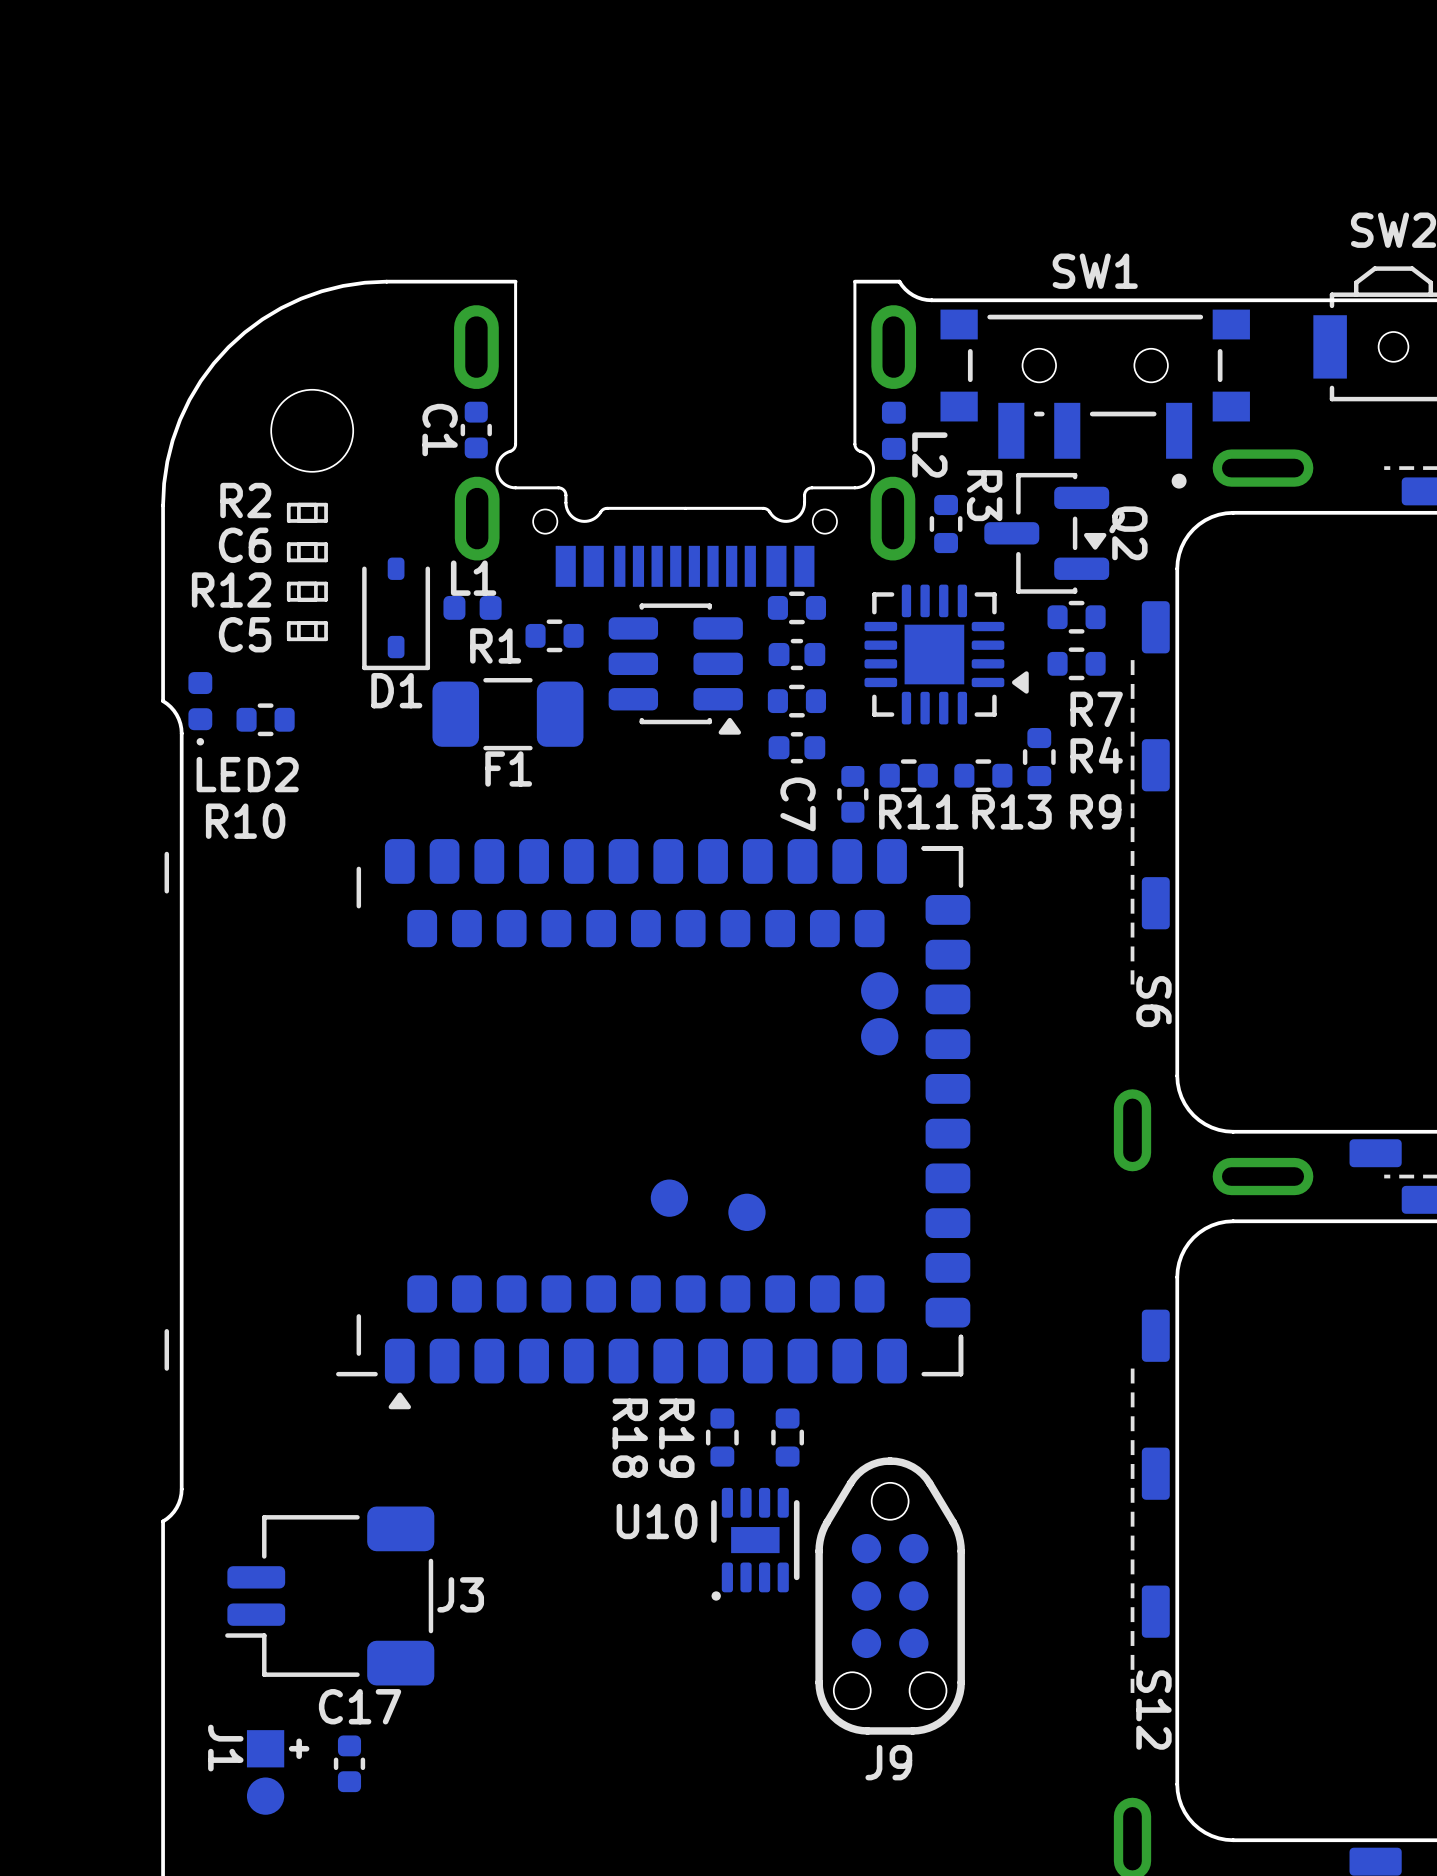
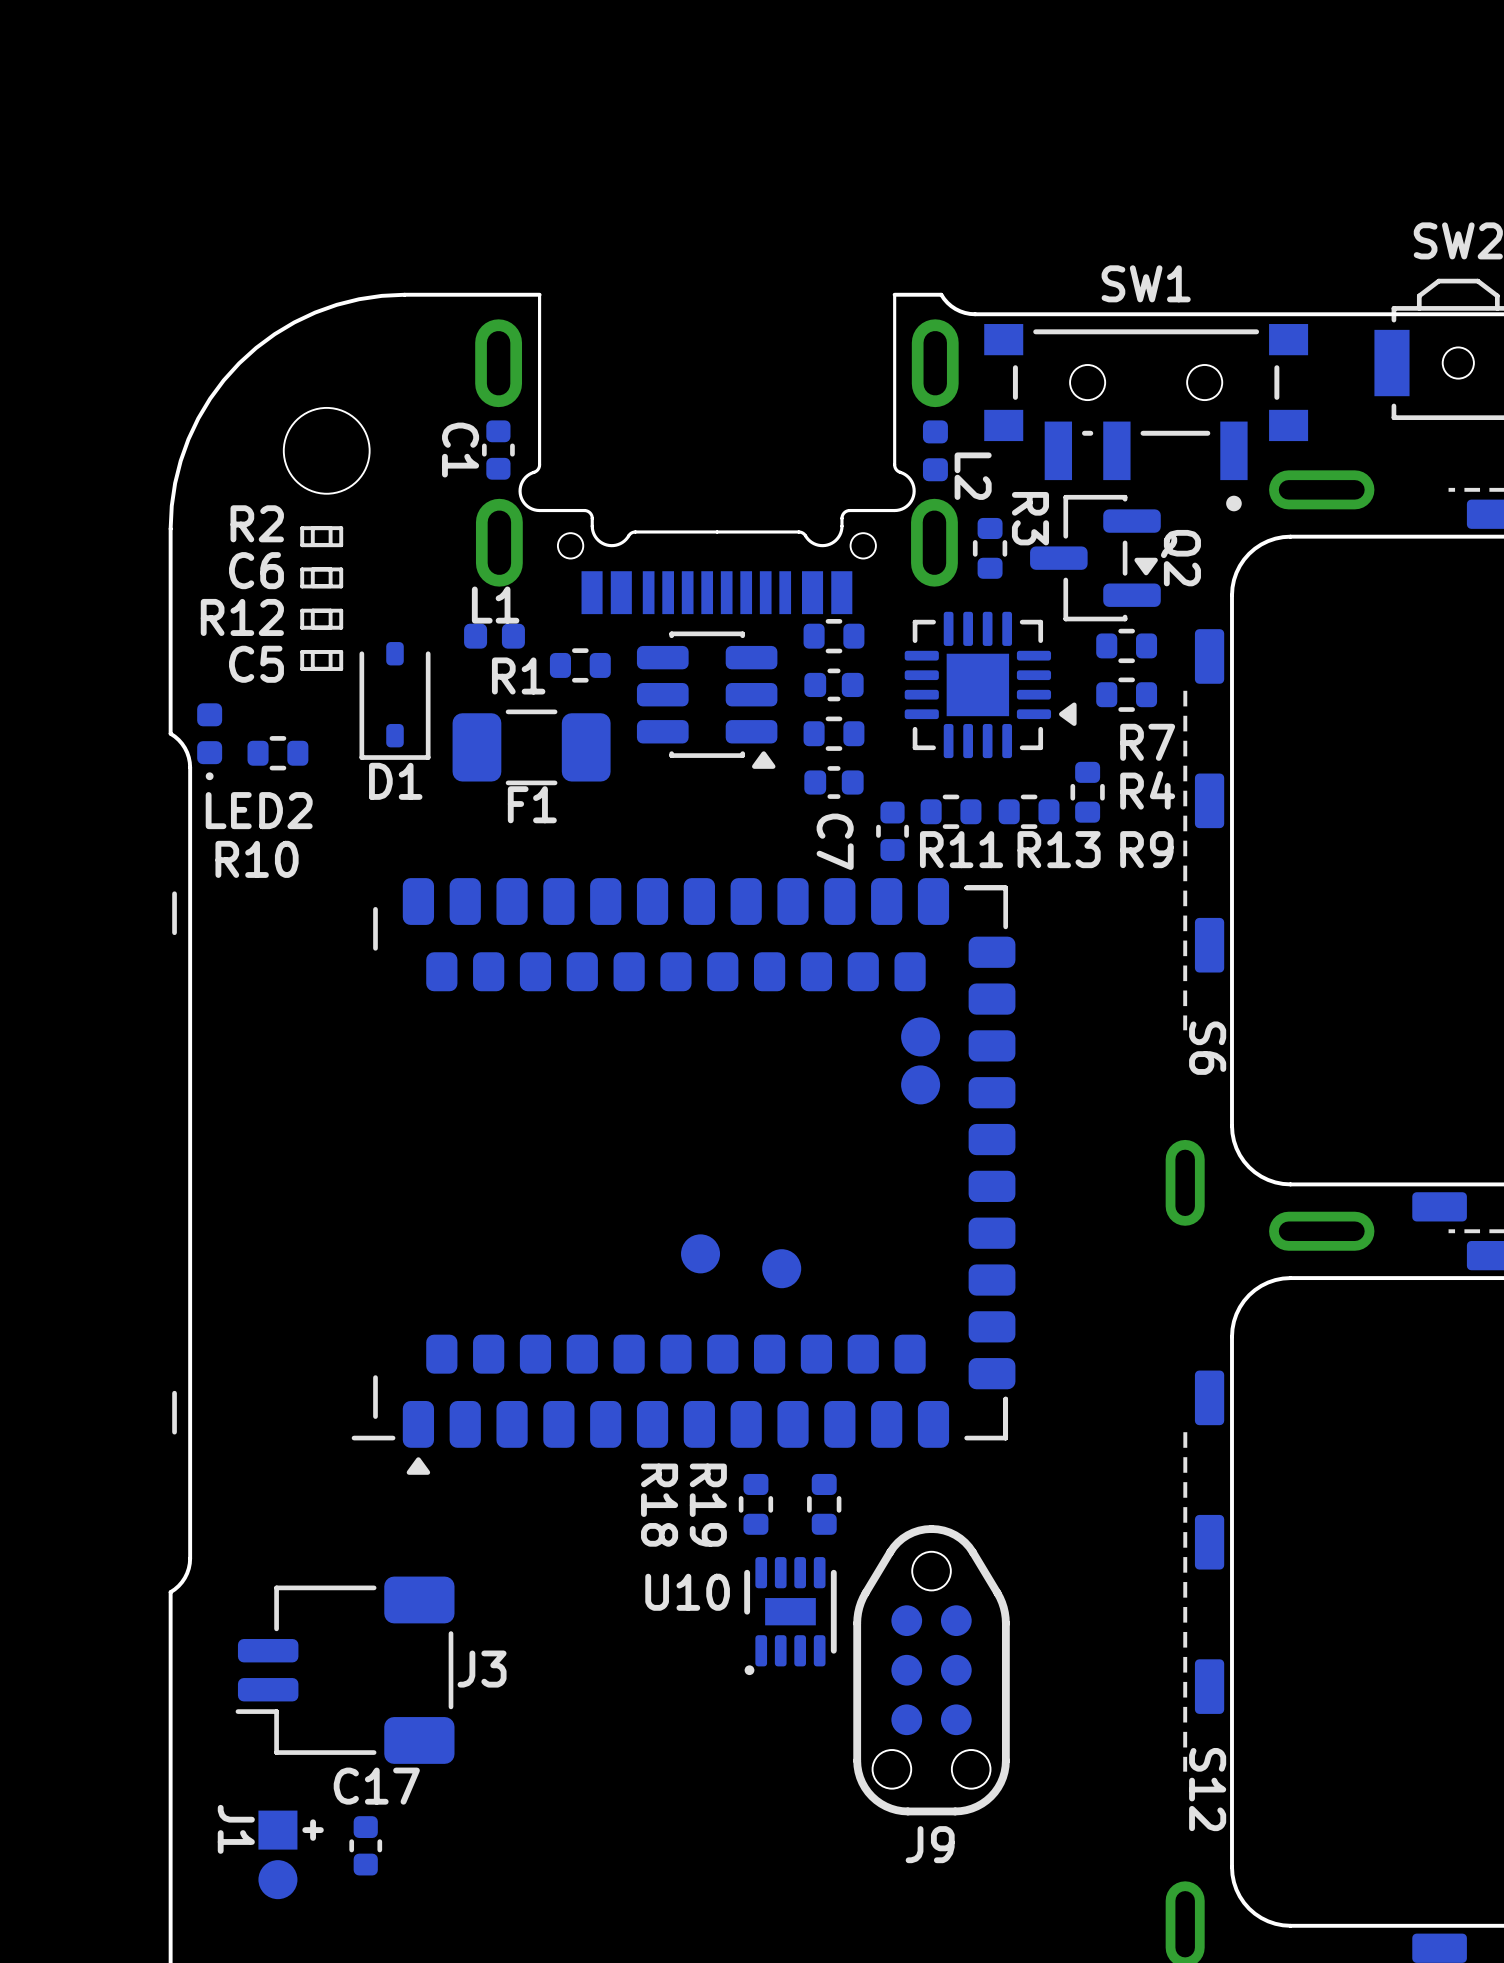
D1 position: (396, 613) -> (395, 700)

